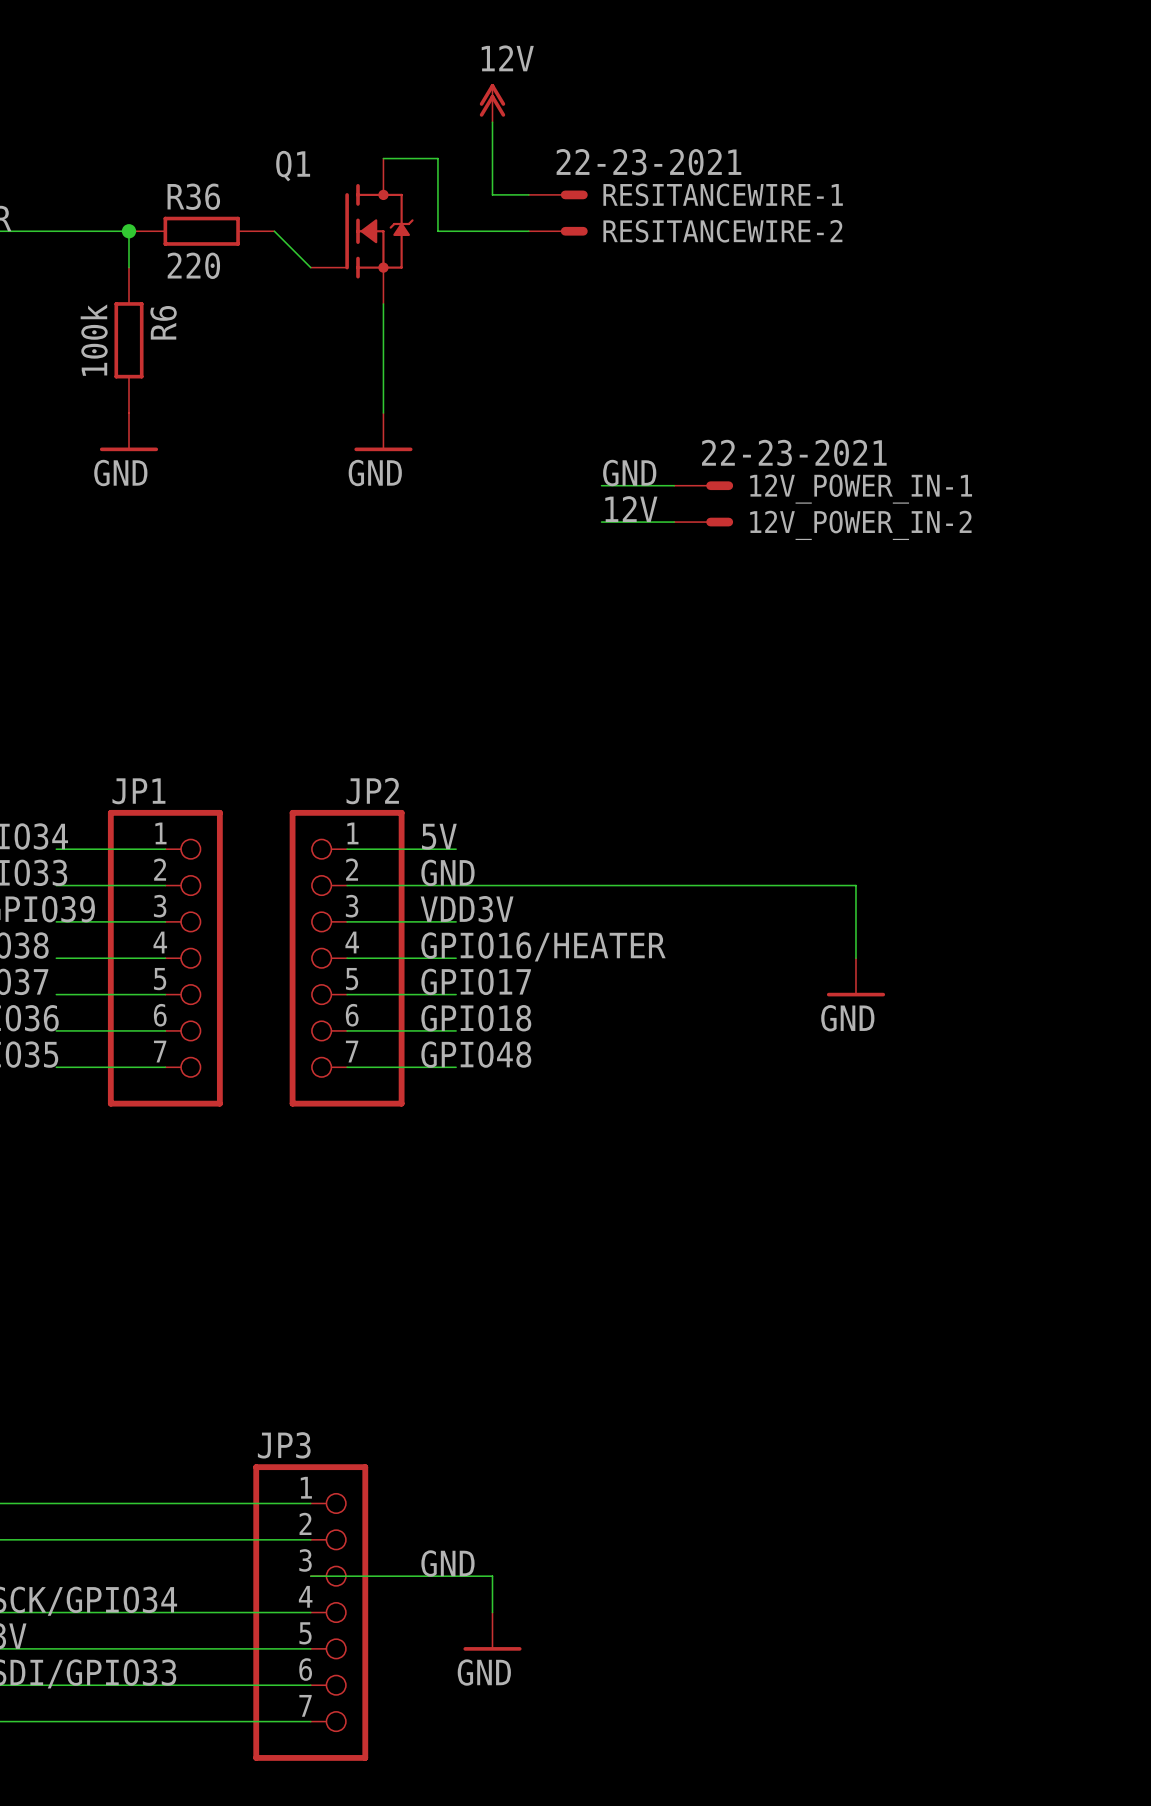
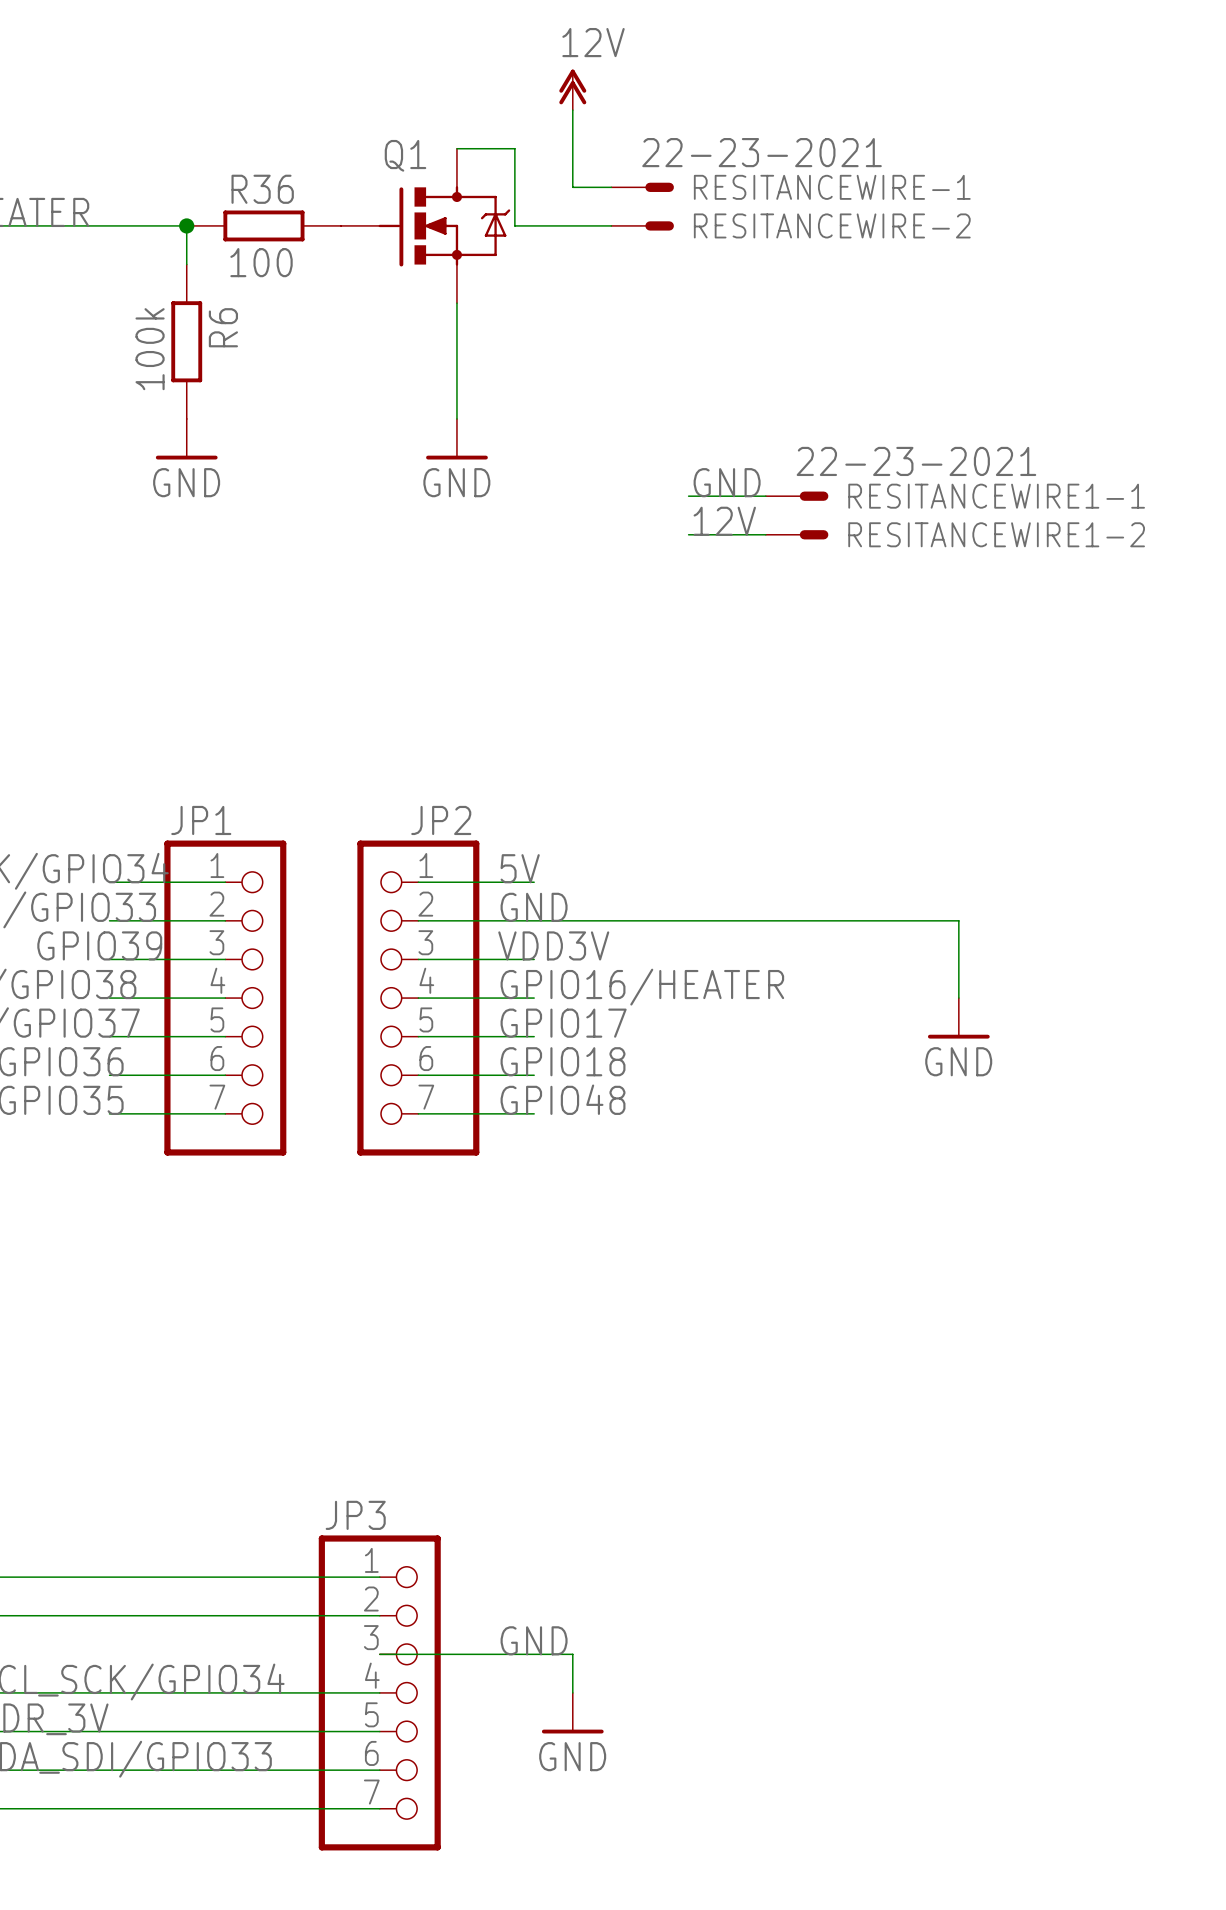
Q1 symbol: [310, 158, 414, 304] -> [341, 148, 511, 304]
Q1 name position: Q1 (293, 166) -> Q1 (405, 155)
wire: (274, 231) (310, 267) -> none
R36 value: 220 (193, 265) -> 100 (261, 262)
12V_POWER_IN-1 name: 12V_POWER_IN-1 (861, 489) -> RESITANCEWIRE1-1 (996, 496)
12V_POWER_IN-2 name: 12V_POWER_IN-2 (860, 525) -> RESITANCEWIRE1-2 (996, 534)

